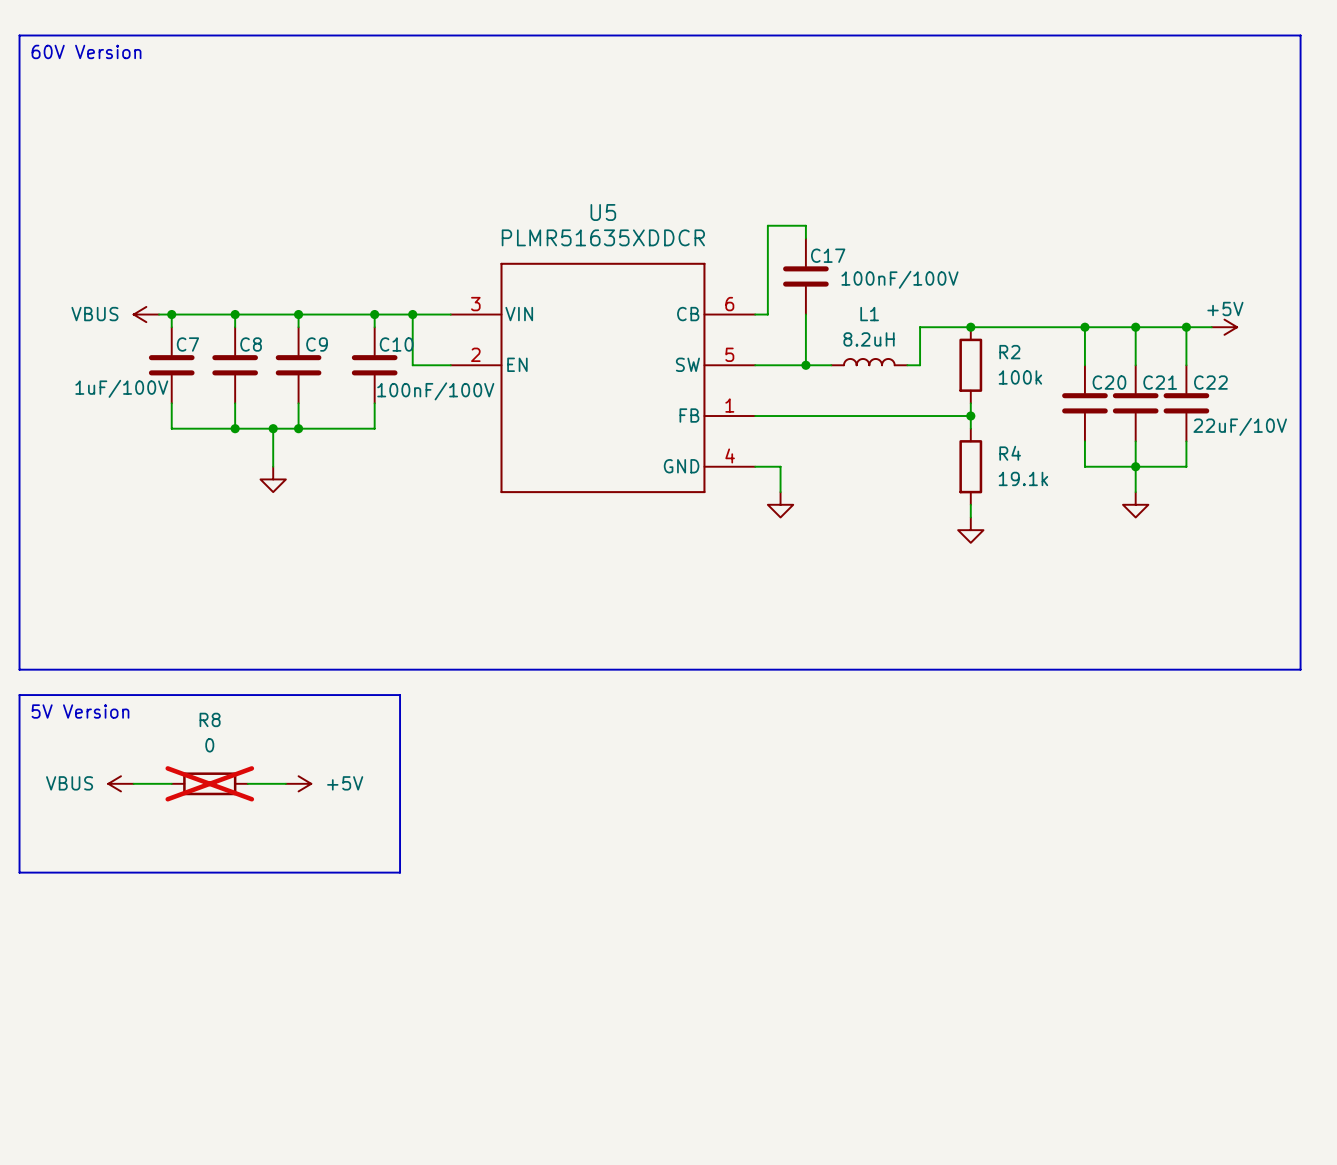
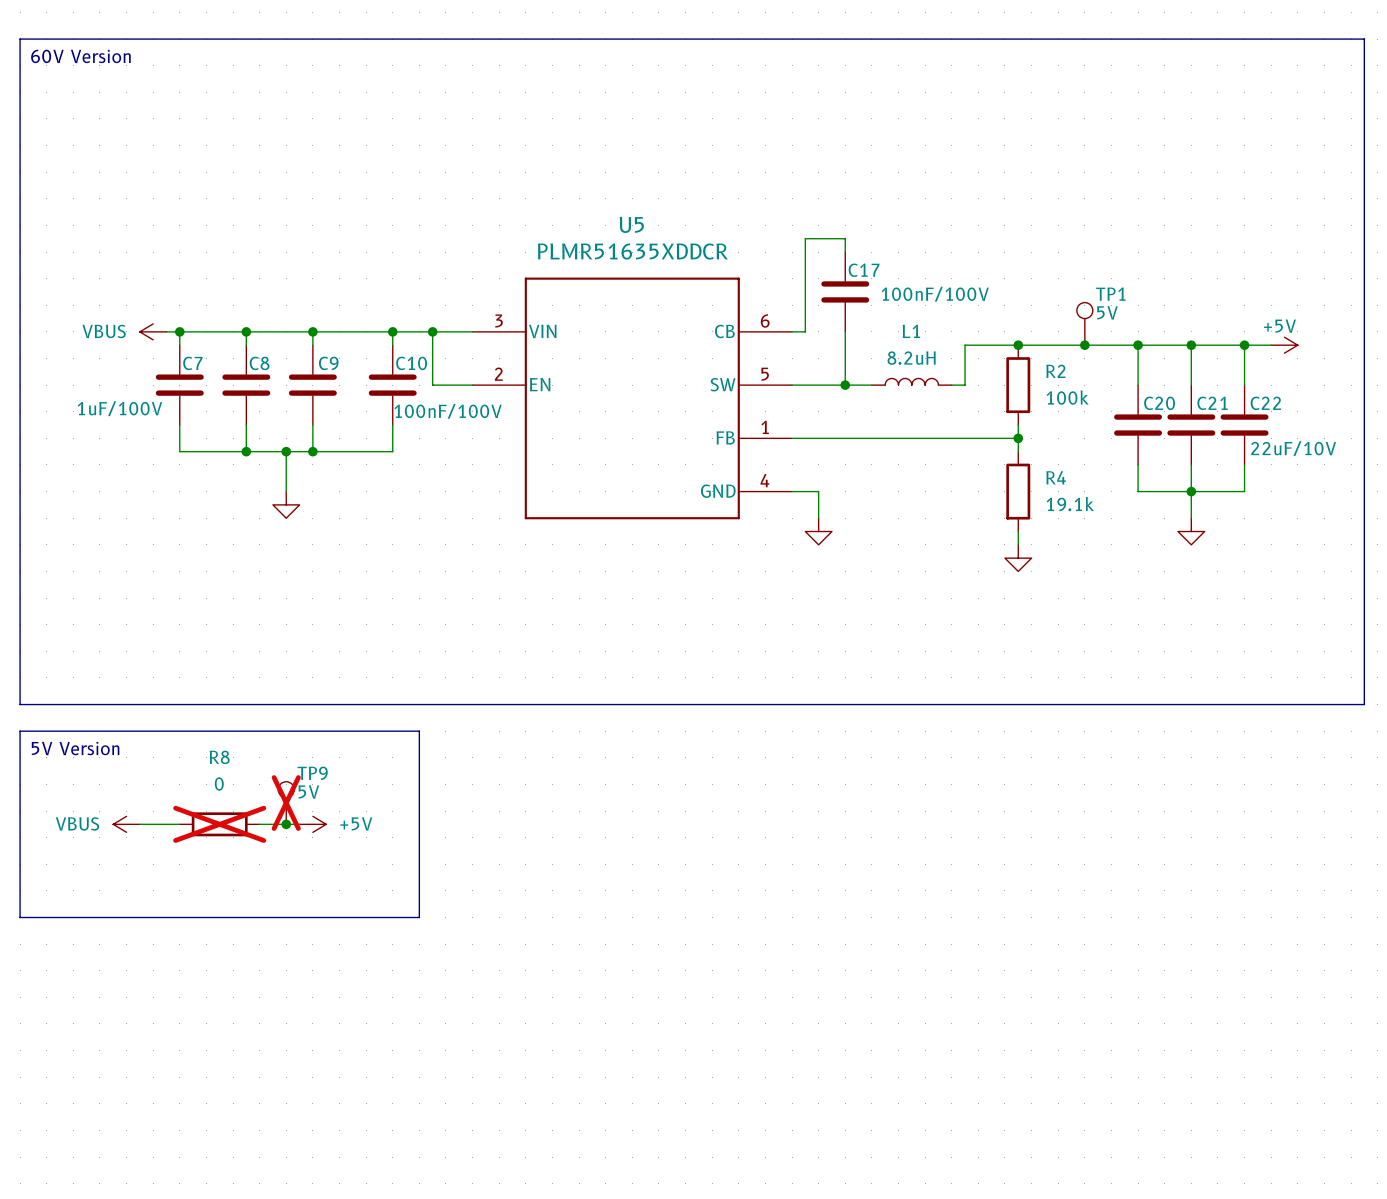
TP1: none -> 5V (1084, 323)
junction: none -> (1084, 345)
TP9: none -> 5V (286, 803)
junction: none -> (286, 824)

